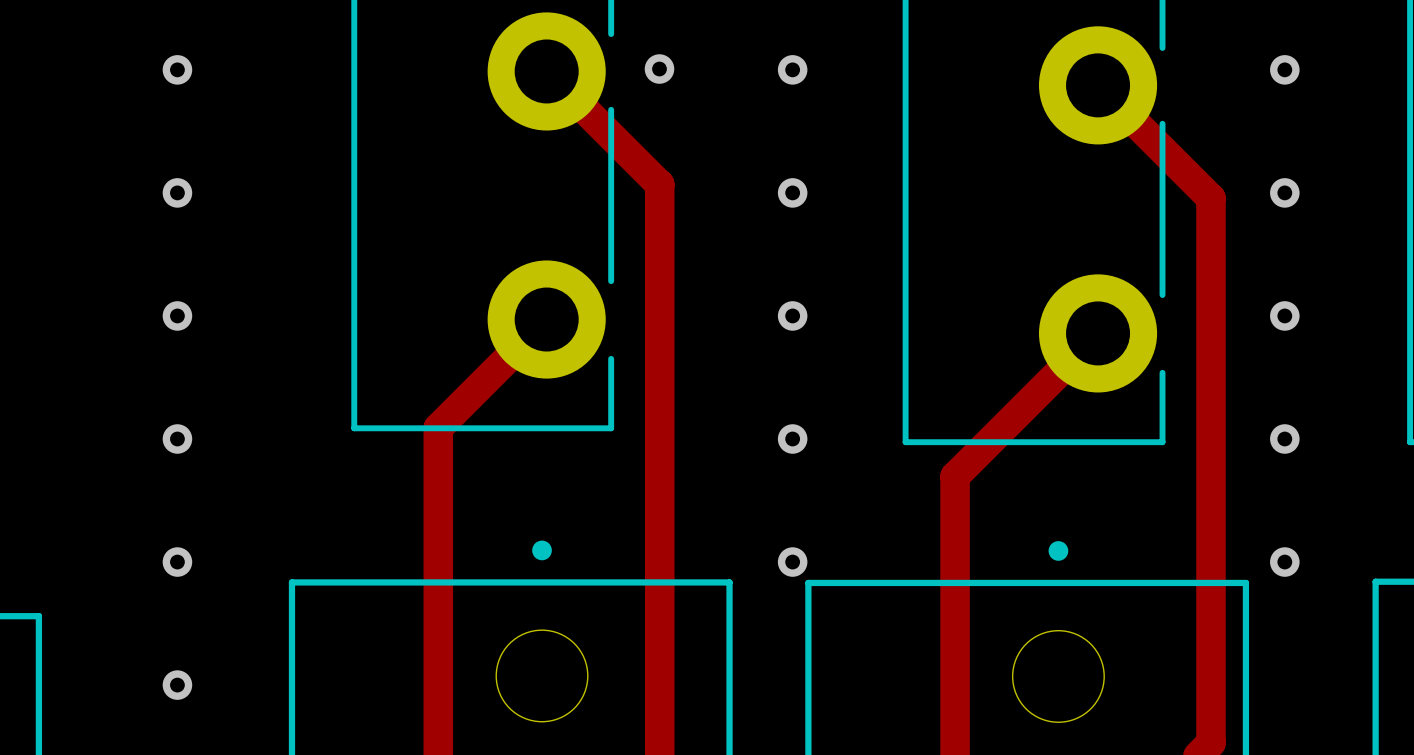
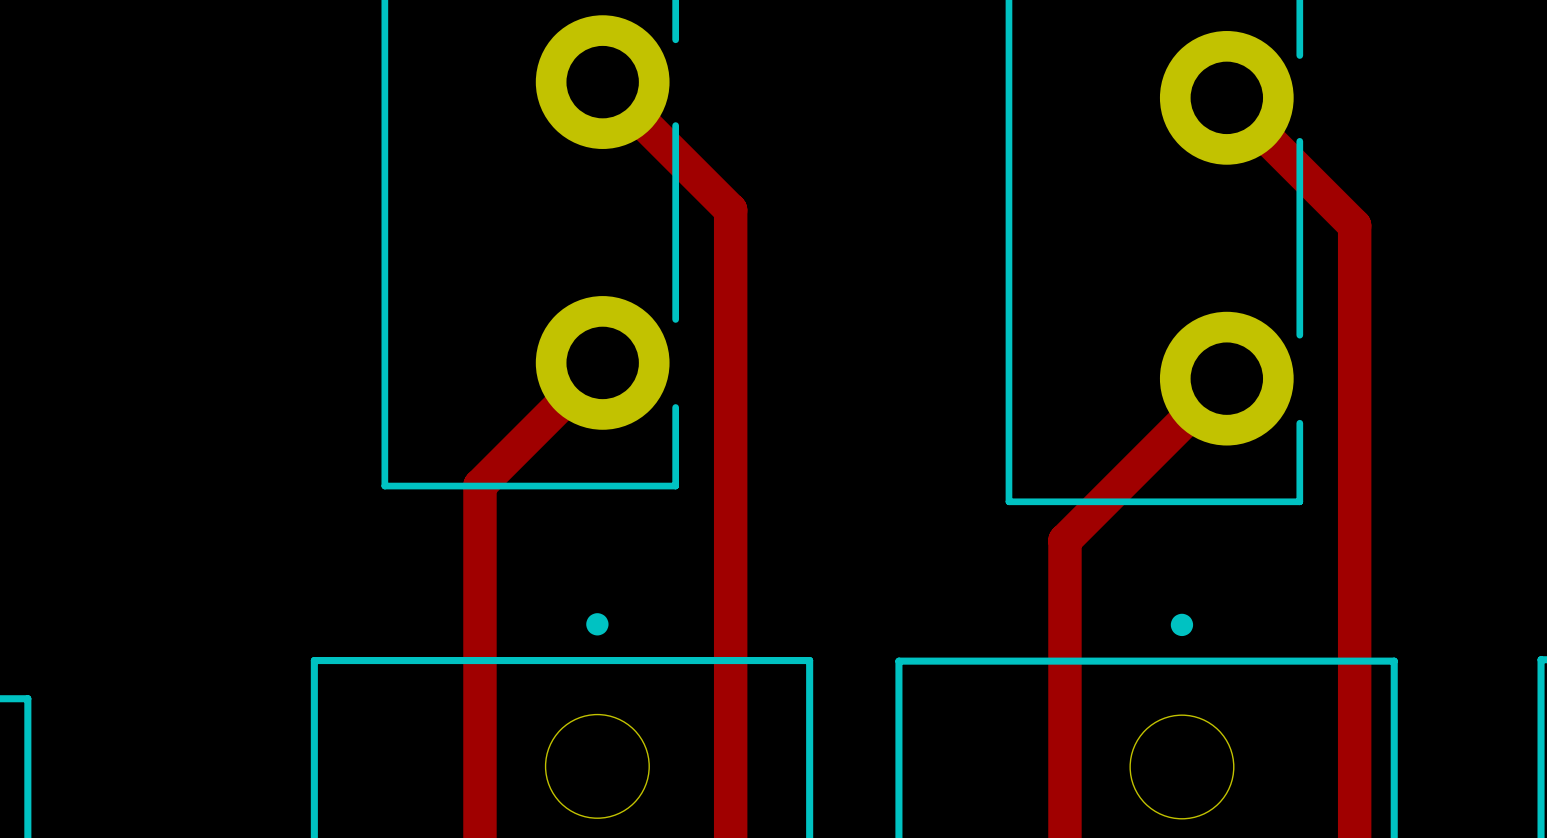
via: (177, 69) -> none
via: (659, 69) -> none
via: (792, 69) -> none
via: (1284, 69) -> none
via: (177, 192) -> none
via: (792, 192) -> none
via: (1284, 192) -> none
via: (177, 315) -> none
via: (792, 315) -> none
via: (1284, 315) -> none
via: (177, 438) -> none
via: (792, 438) -> none
via: (1284, 438) -> none
via: (177, 562) -> none
via: (792, 562) -> none
via: (1284, 562) -> none
via: (177, 685) -> none

